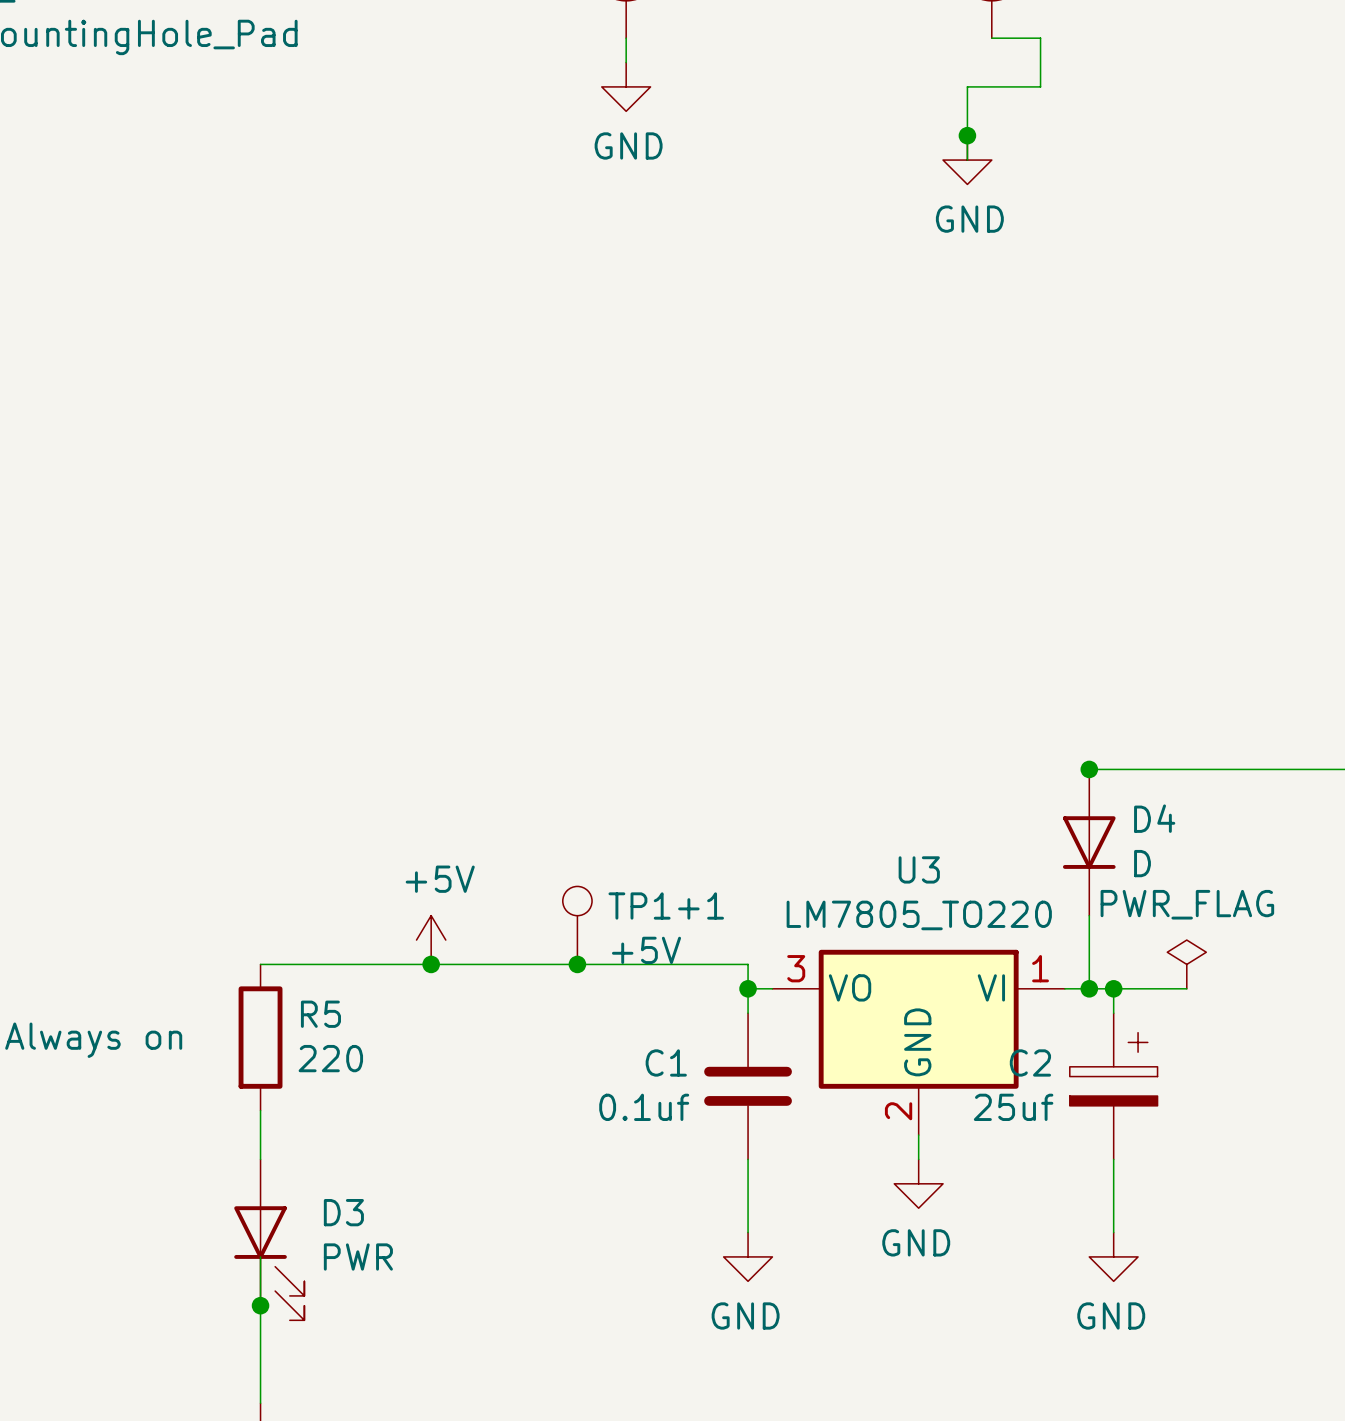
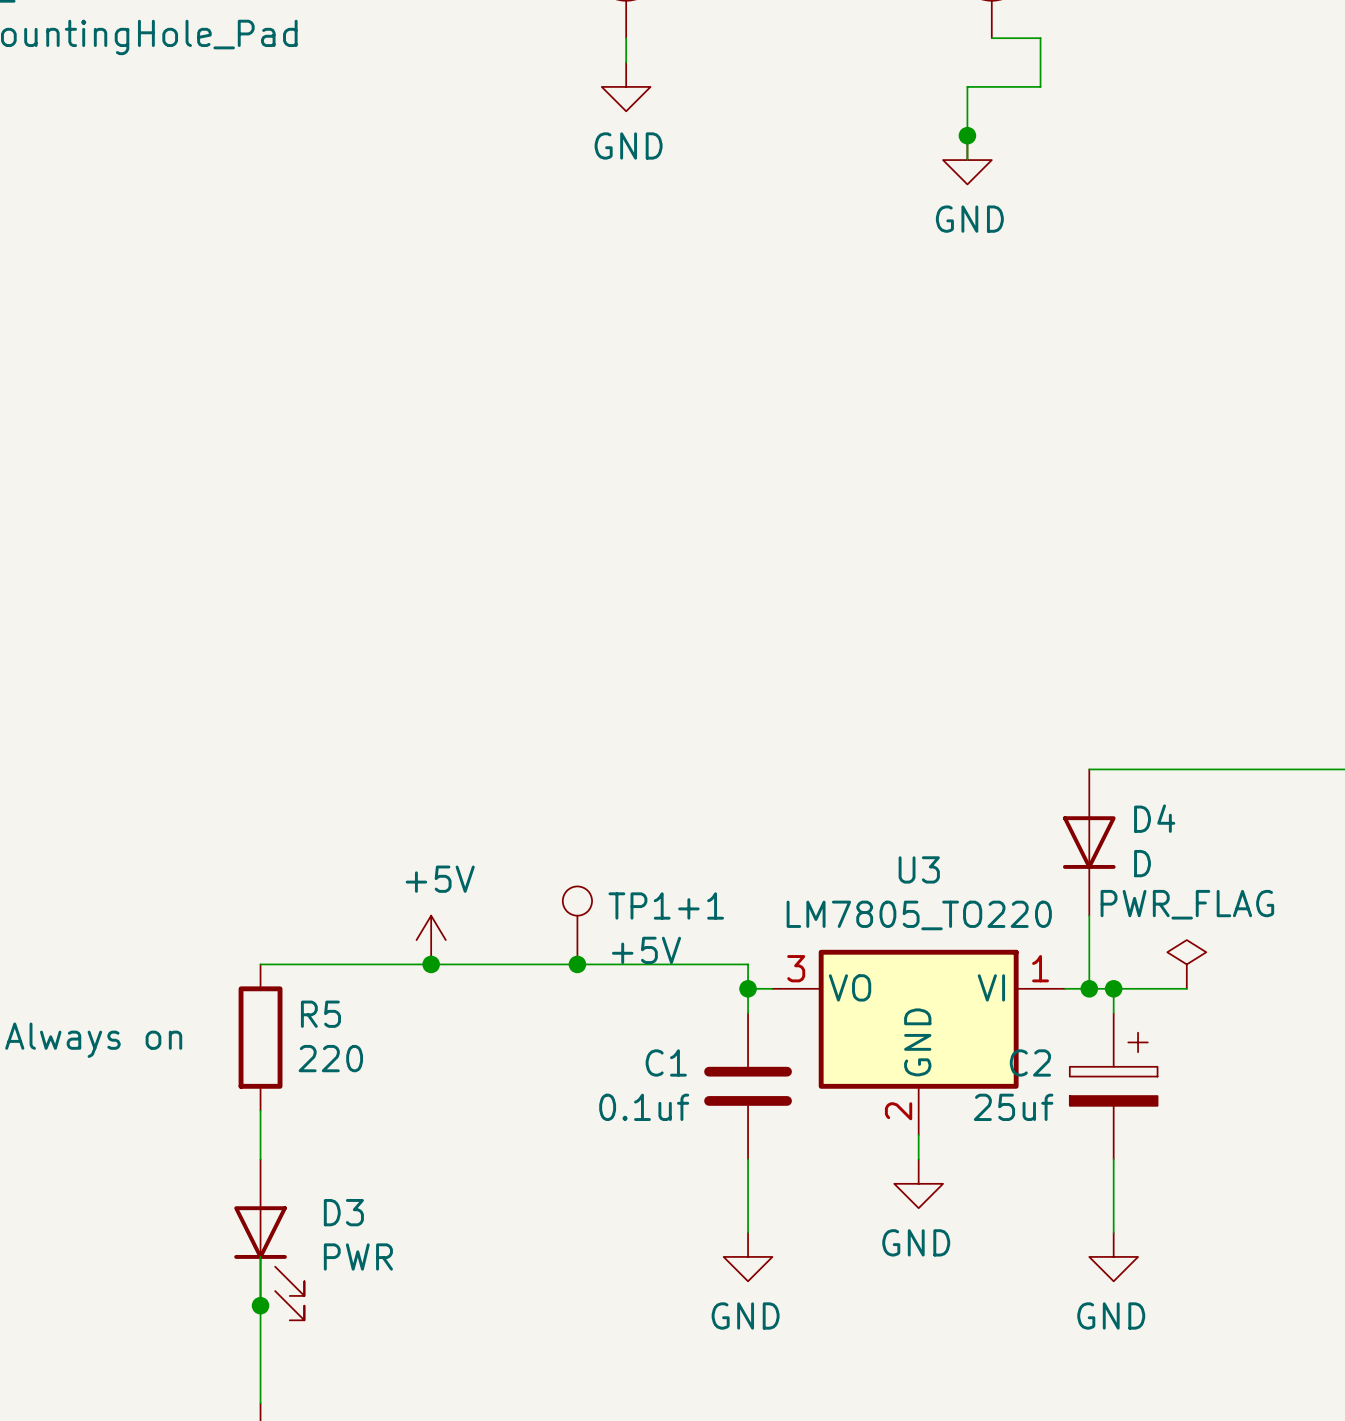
junction: (1089, 769) -> none

